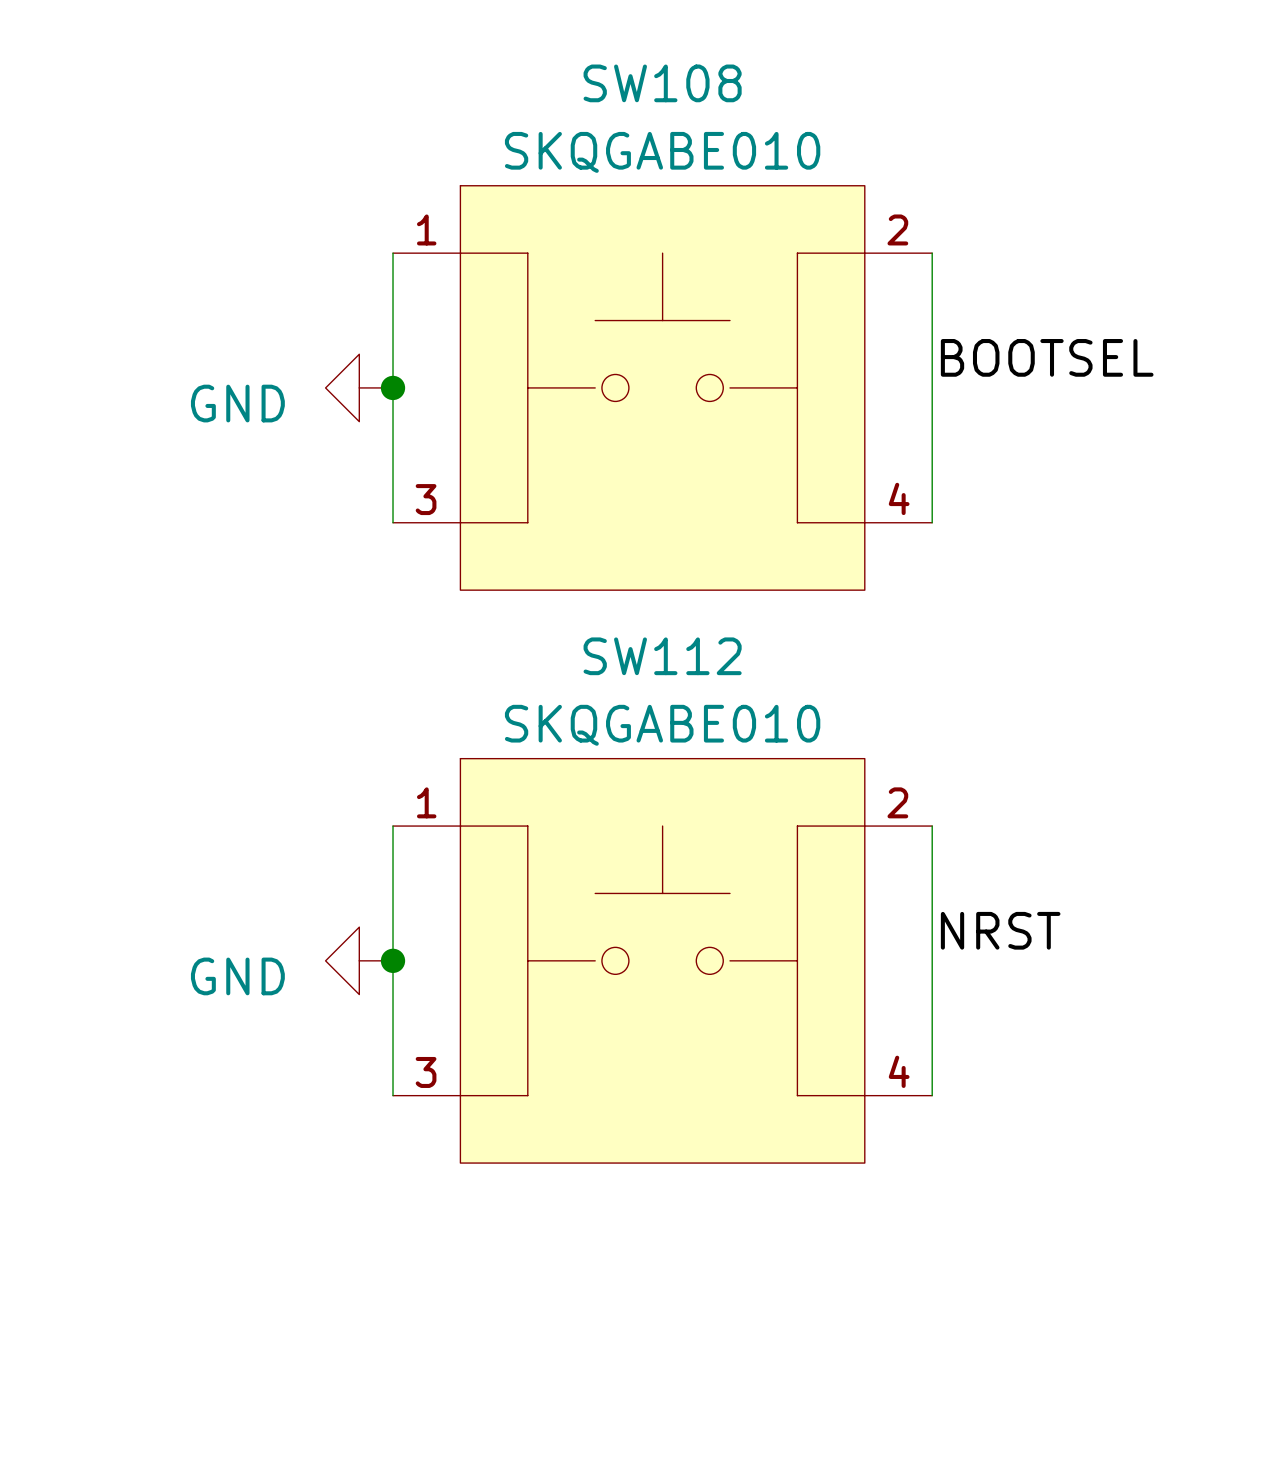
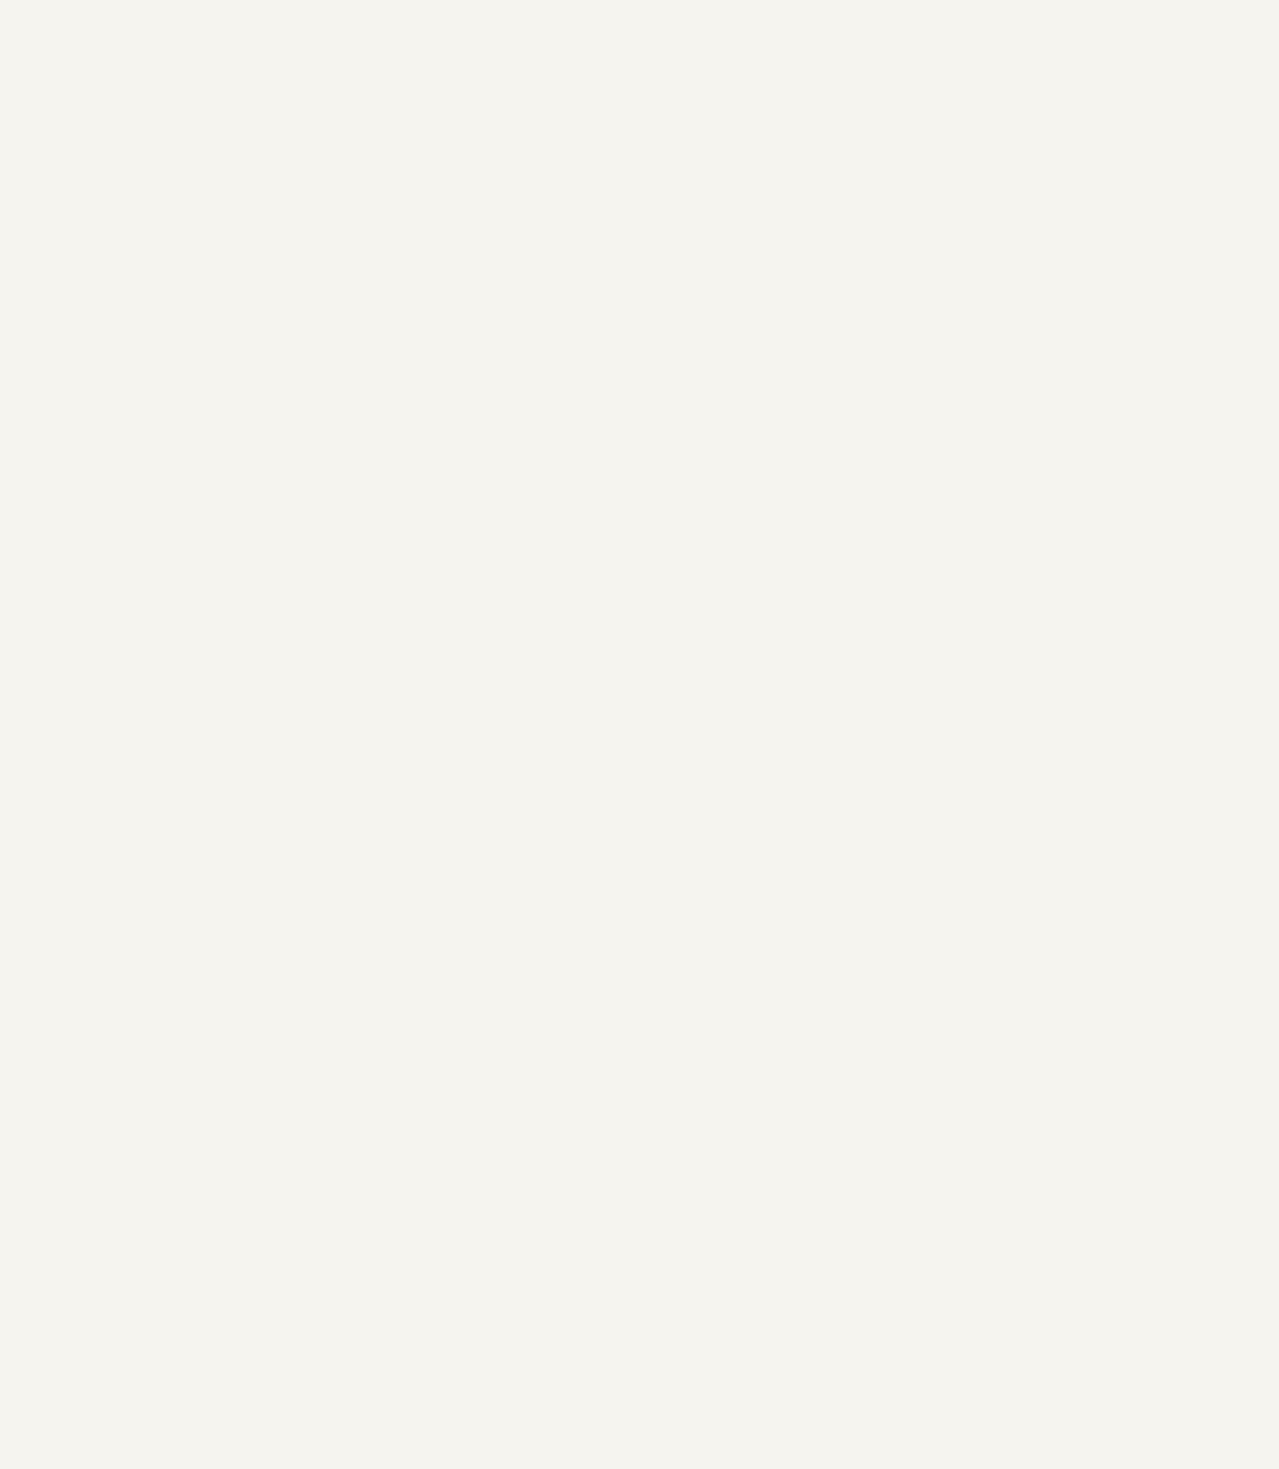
wire: (393, 253) (393, 522) -> none
wire: (932, 253) (932, 522) -> none
label: BOOTSEL (1047, 357) -> none
power symbol: GND (359, 387) -> none
junction: (393, 387) -> none
SW108: SKQGABE010 (662, 387) -> none
wire: (393, 826) (393, 1095) -> none
wire: (932, 826) (932, 1095) -> none
label: NRST (1000, 930) -> none
power symbol: GND (359, 960) -> none
junction: (393, 960) -> none
SW112: SKQGABE010 (662, 960) -> none

